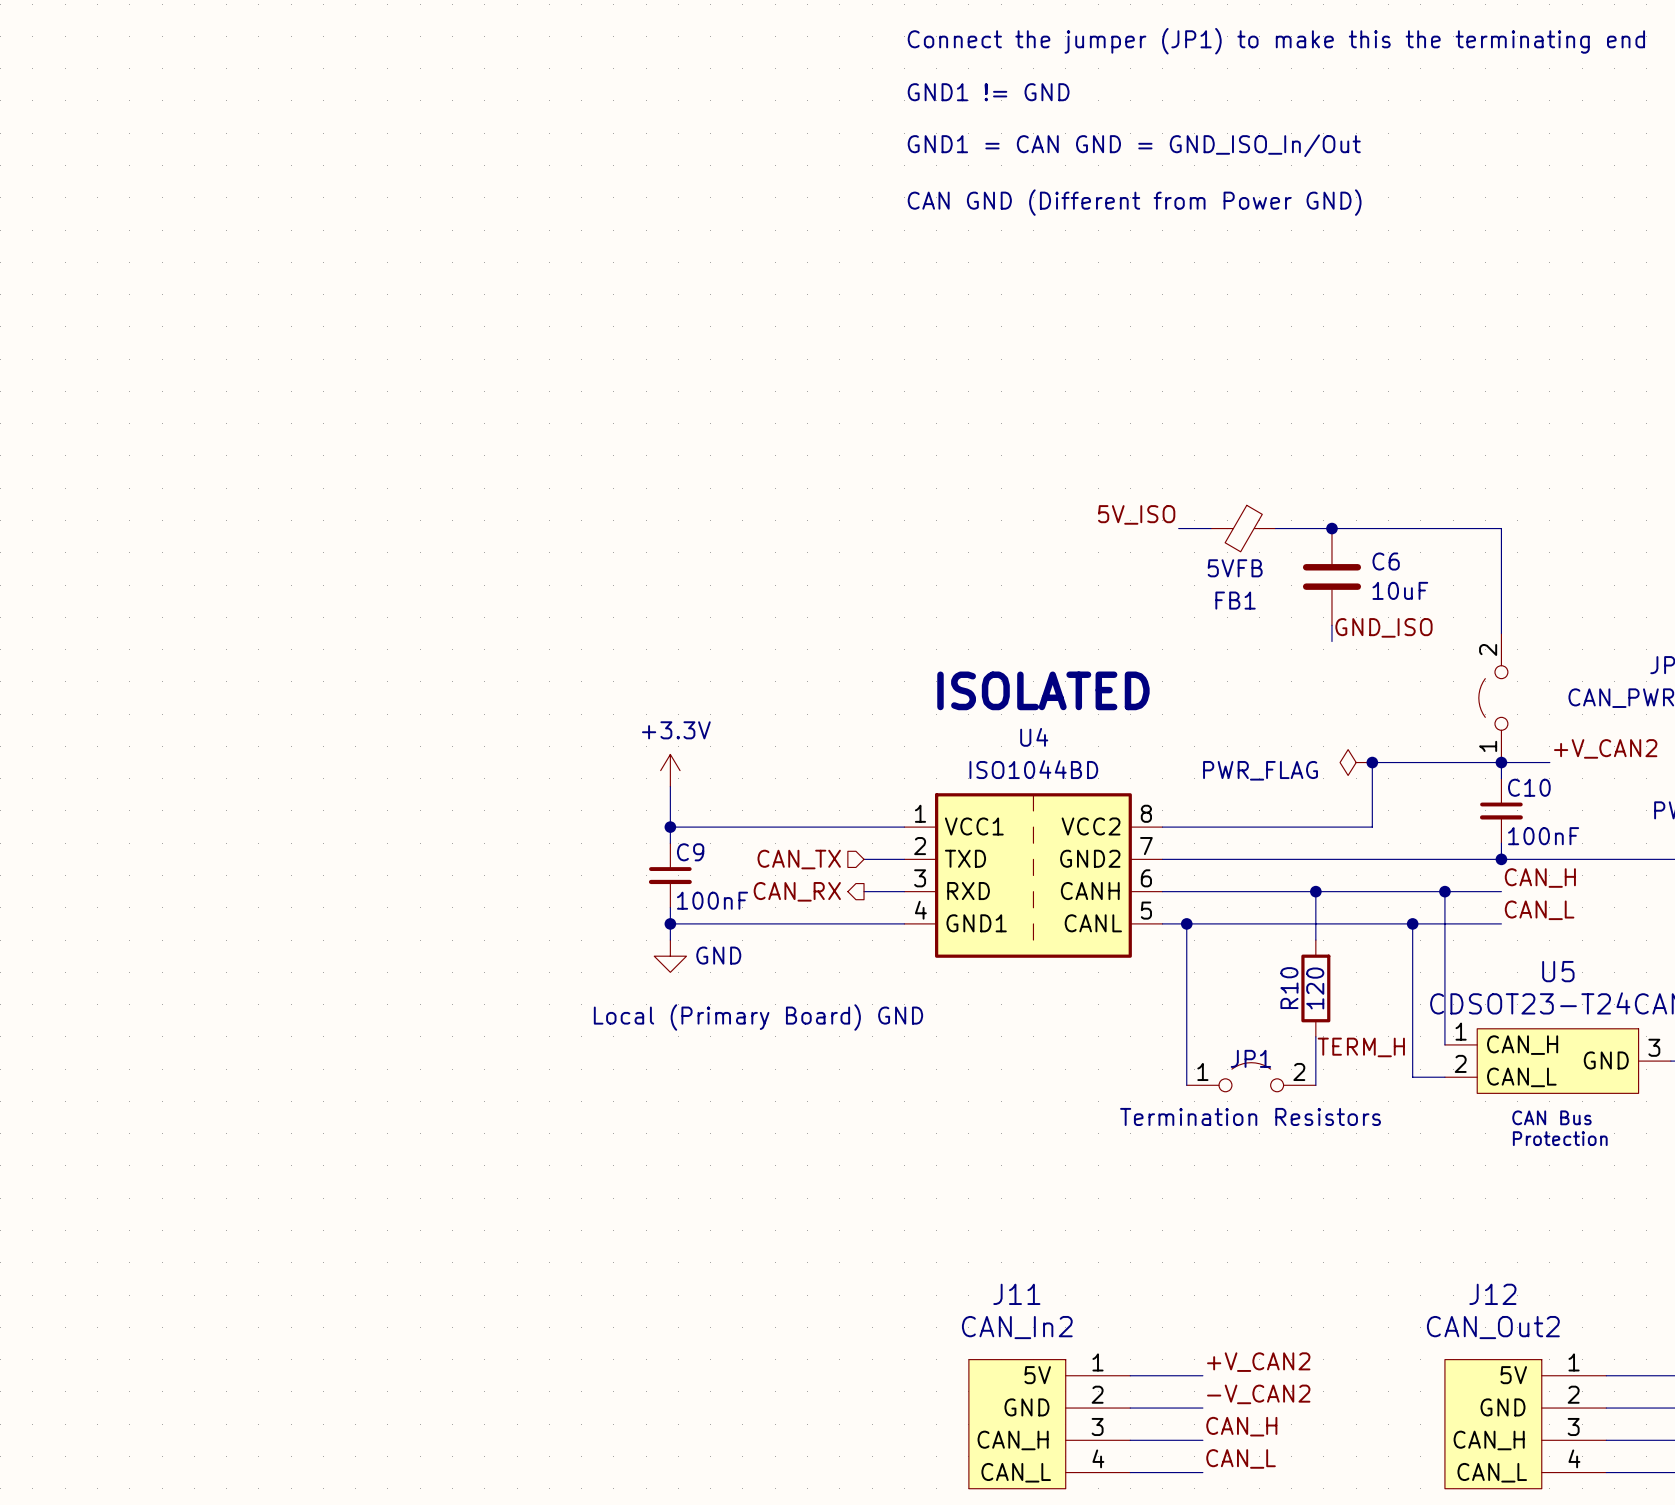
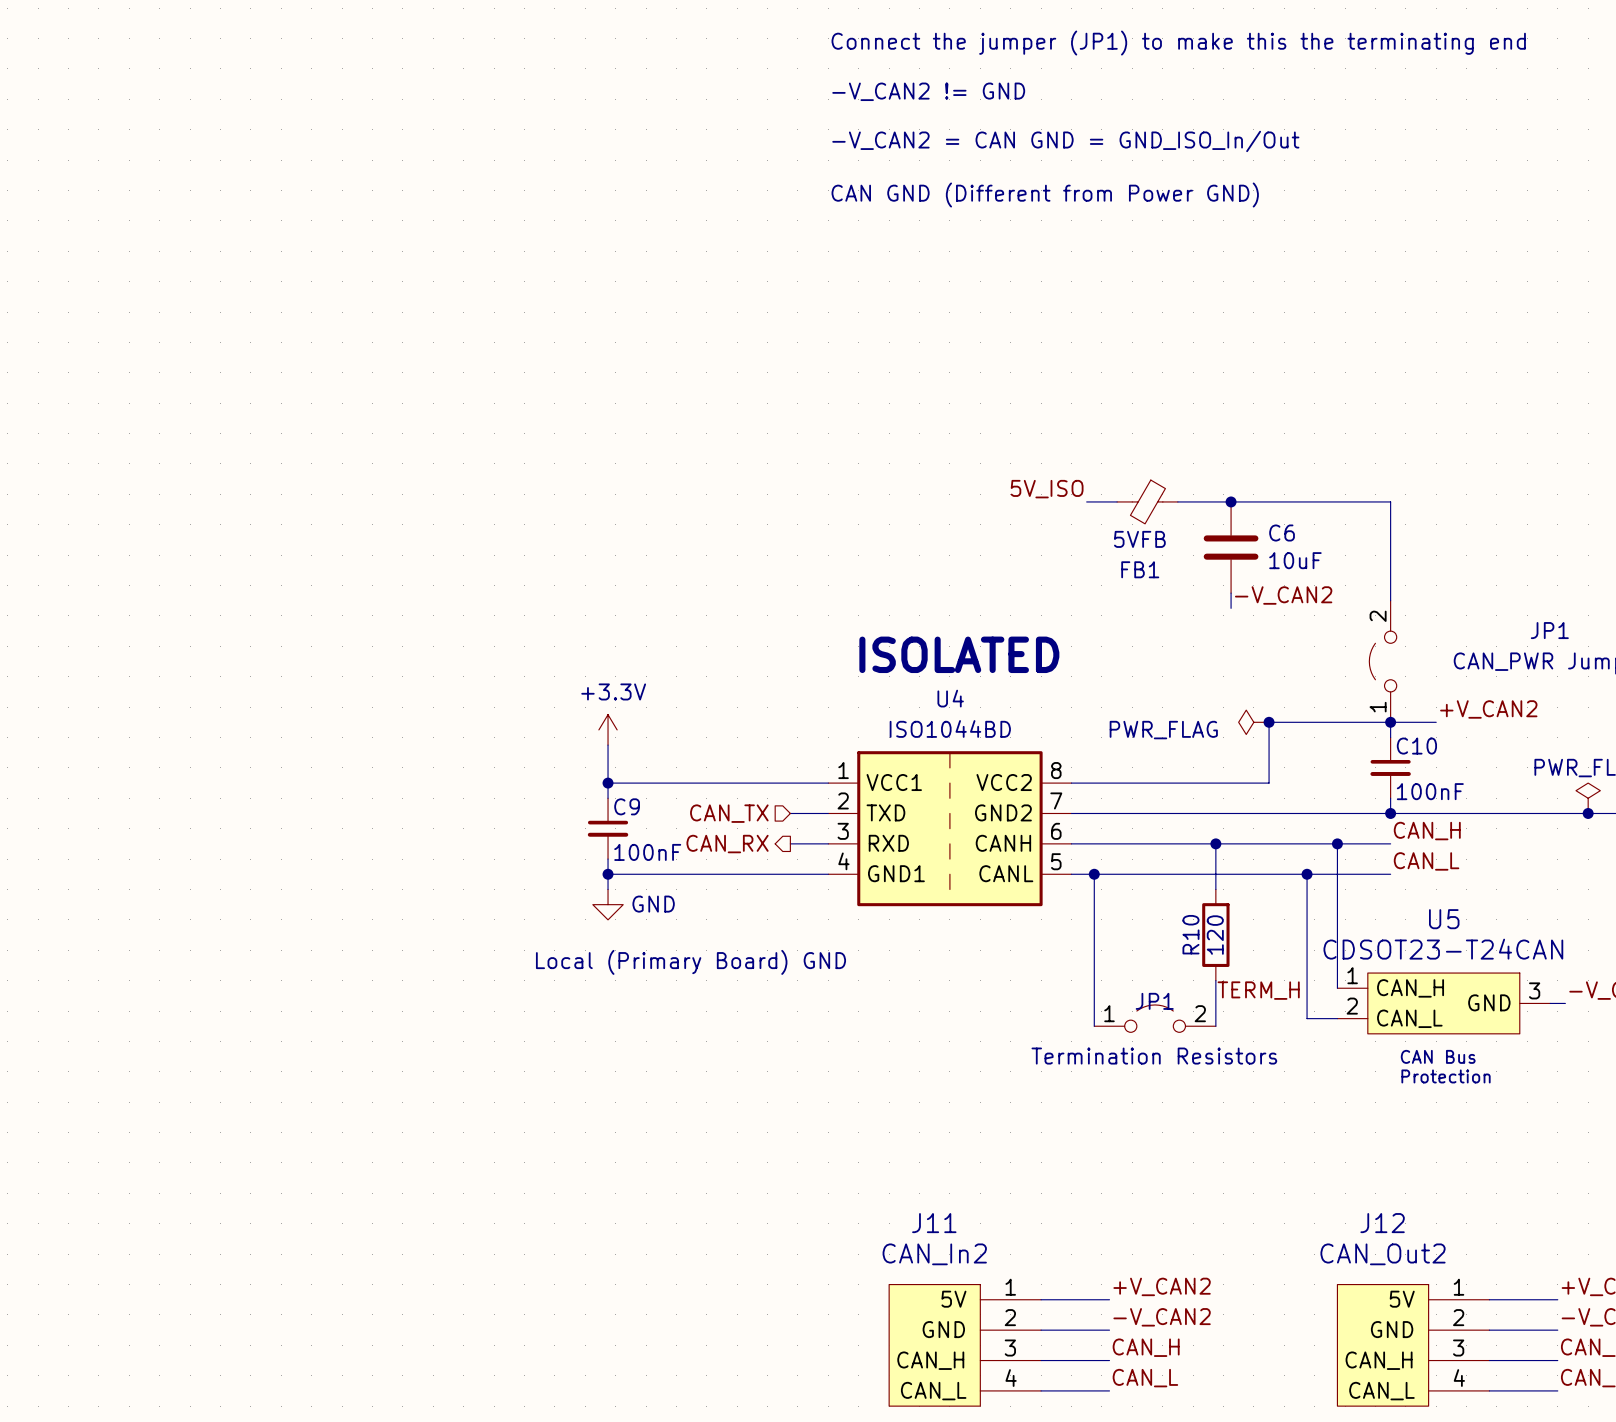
text: GND1 != GND (988, 92) -> -V_CAN2 != GND (928, 91)
text: GND1 = CAN GND = GND_ISO_In/Out (1134, 145) -> -V_CAN2 = CAN GND = GND_ISO_In/Out (1065, 141)
label: GND_ISO (1383, 627) -> -V_CAN2 (1283, 595)

